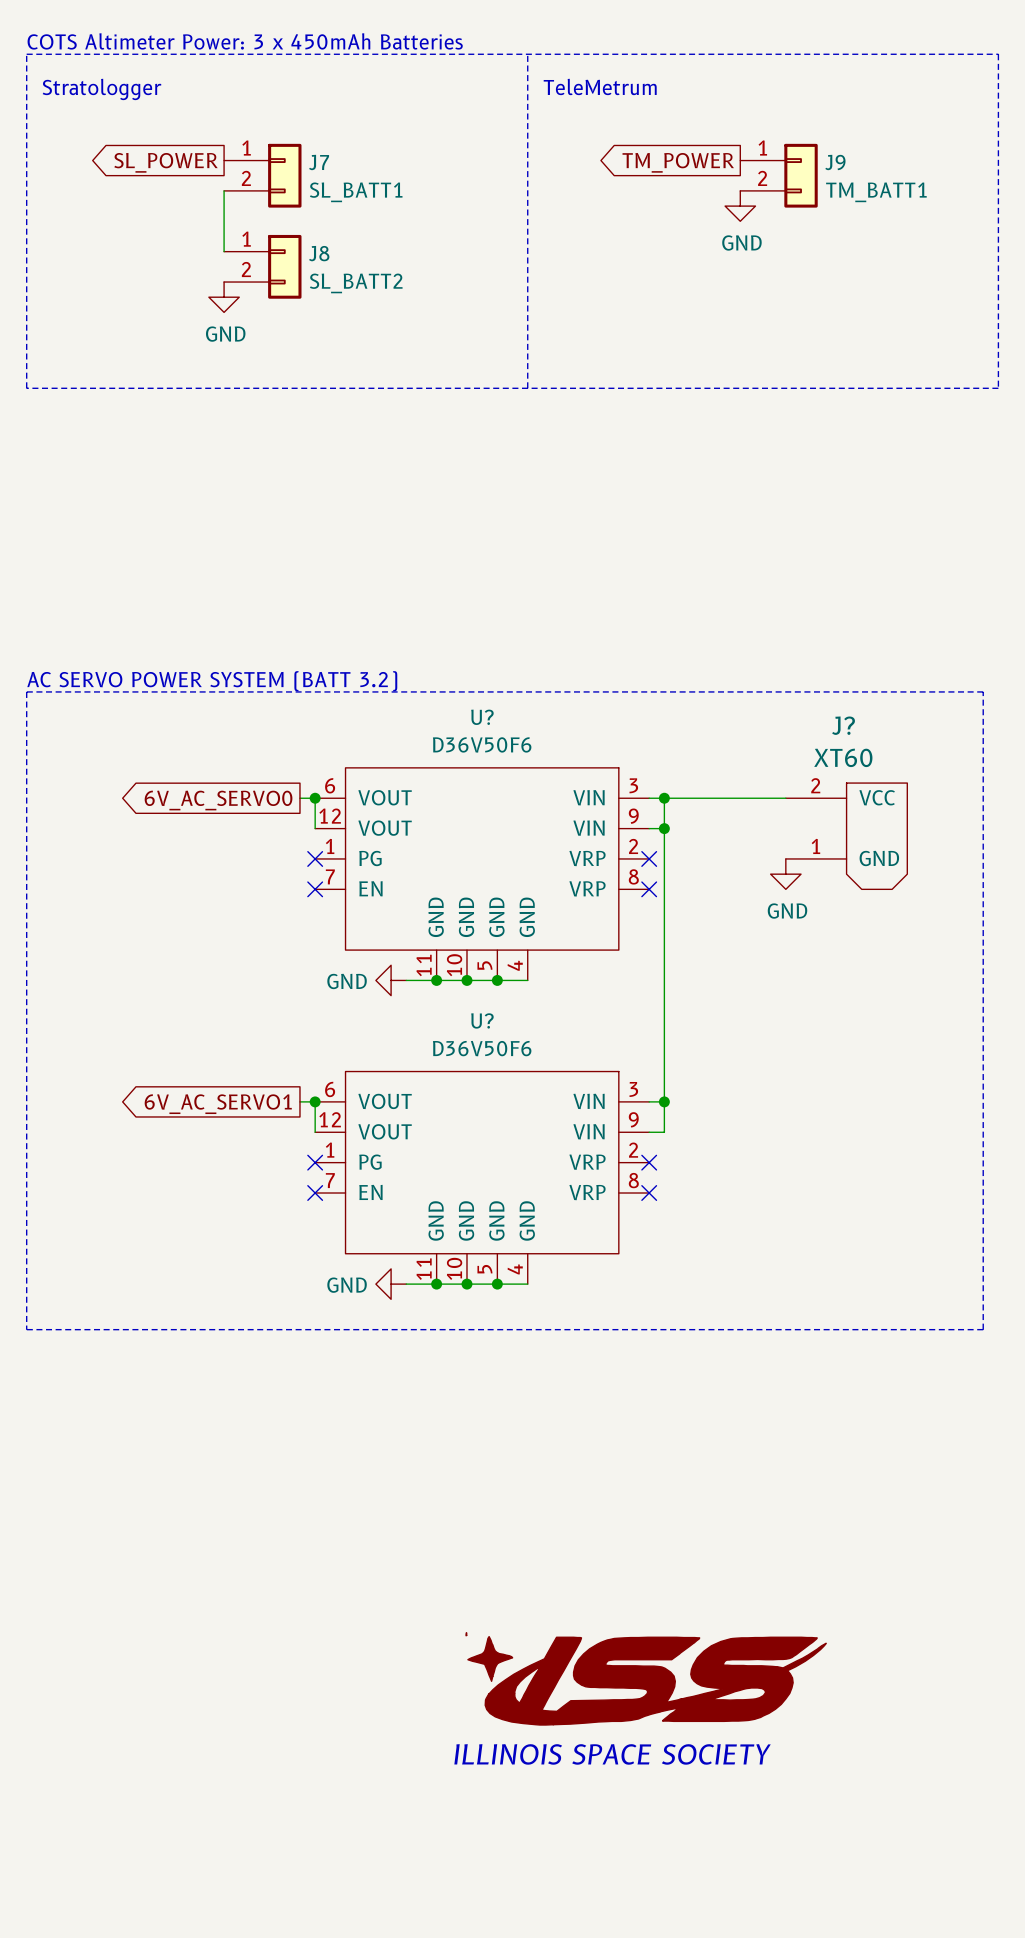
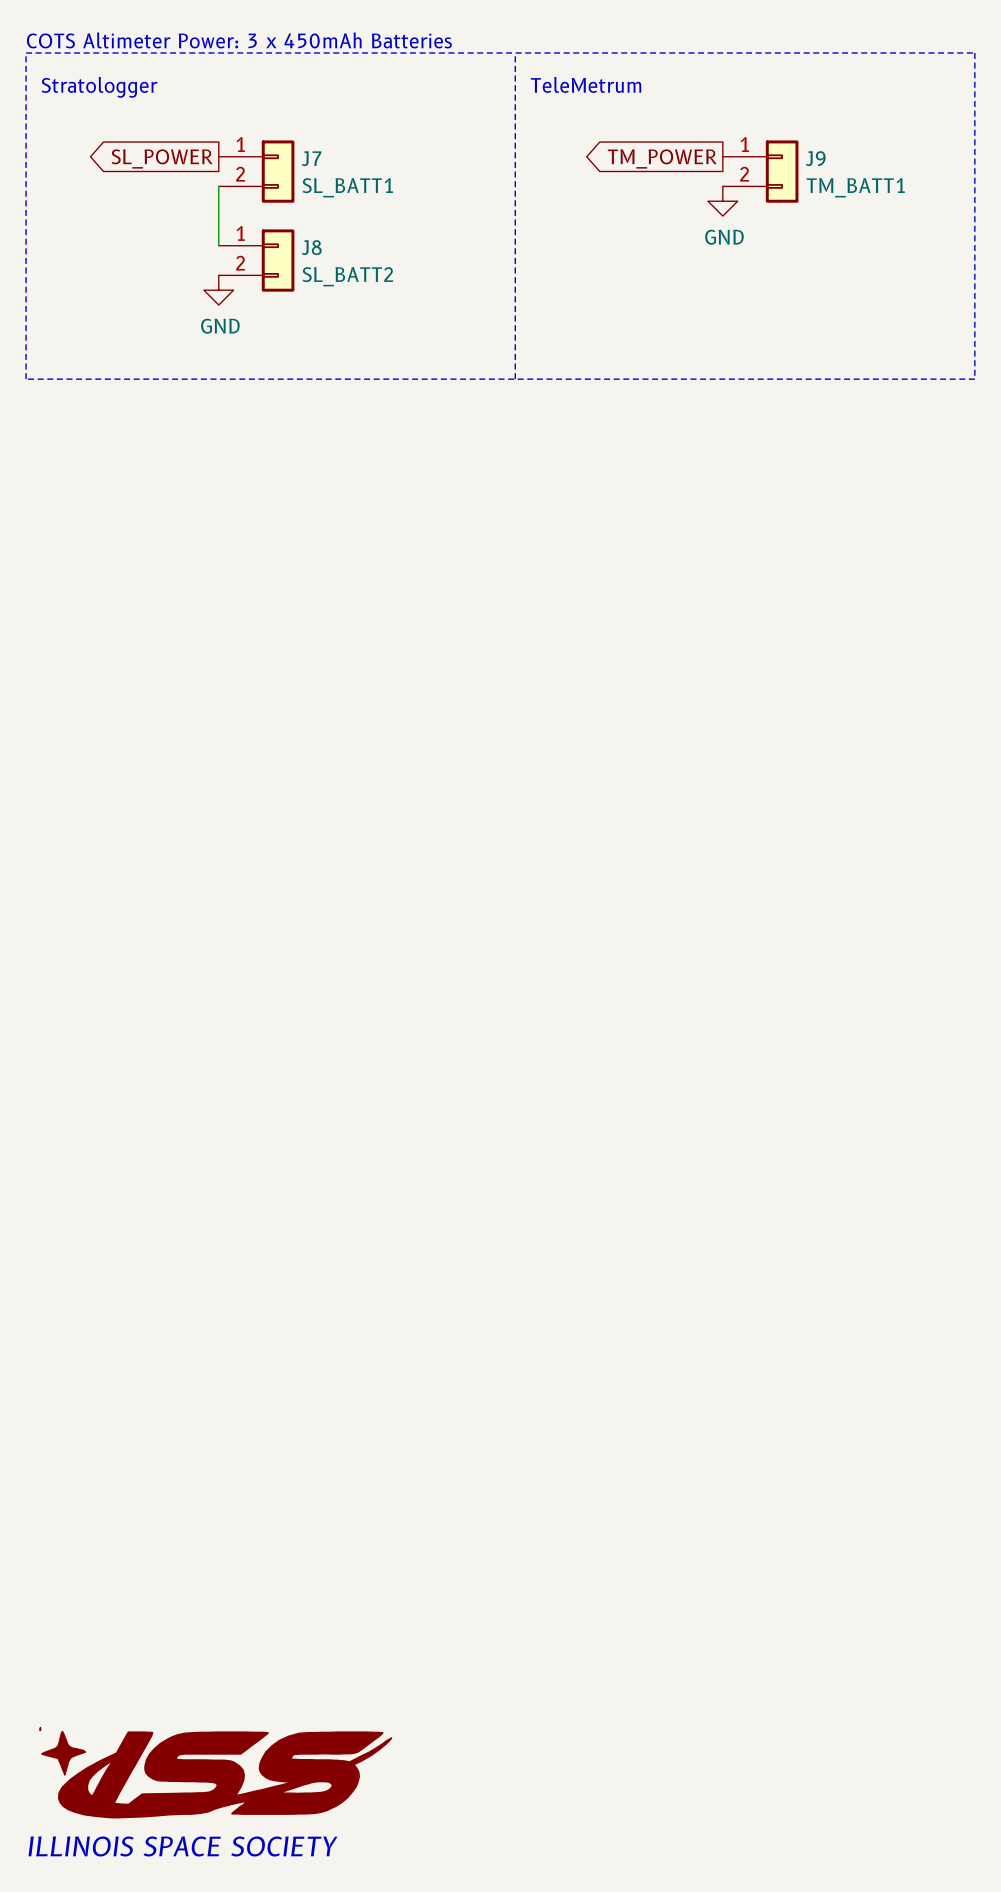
text: AC SERVO POWER SYSTEM (BATT 3.2) (212, 681) -> none
line: (26, 691) (26, 1329) (983, 1329) (983, 691) (26, 691) -> none
wire: (299, 798) (315, 798) (315, 828) -> none
junction: (315, 798) -> none
wire: (649, 798) (785, 798) -> none
wire: (664, 798) (664, 1132) (649, 1132) -> none
junction: (664, 798) -> none
global label: 6V_AC_SERVO0 (218, 800) -> none
wire: (649, 828) (664, 828) -> none
junction: (664, 828) -> none
J?: XT60 (846, 836) -> none
no-connect mark: (315, 858) -> none
no-connect mark: (649, 858) -> none
U?: D36V50F6 (482, 874) -> none
power symbol: GND (785, 874) -> none
no-connect mark: (315, 889) -> none
no-connect mark: (649, 889) -> none
power symbol: GND (391, 980) -> none
wire: (406, 980) (527, 980) -> none
junction: (436, 980) -> none
junction: (466, 980) -> none
junction: (497, 980) -> none
wire: (299, 1101) (315, 1101) (315, 1132) -> none
junction: (315, 1101) -> none
wire: (649, 1101) (664, 1101) -> none
junction: (664, 1101) -> none
global label: 6V_AC_SERVO1 (218, 1104) -> none
no-connect mark: (315, 1162) -> none
no-connect mark: (649, 1162) -> none
U?: D36V50F6 (482, 1177) -> none
no-connect mark: (315, 1193) -> none
no-connect mark: (649, 1193) -> none
power symbol: GND (391, 1284) -> none
wire: (406, 1284) (527, 1284) -> none
junction: (436, 1284) -> none
junction: (466, 1284) -> none
junction: (497, 1284) -> none
power symbol: (646, 1678) -> none
text: ILLINOIS SPACE SOCIETY (612, 1754) -> none
power symbol: none -> (215, 1772)
text: none -> ILLINOIS SPACE SOCIETY (183, 1846)

